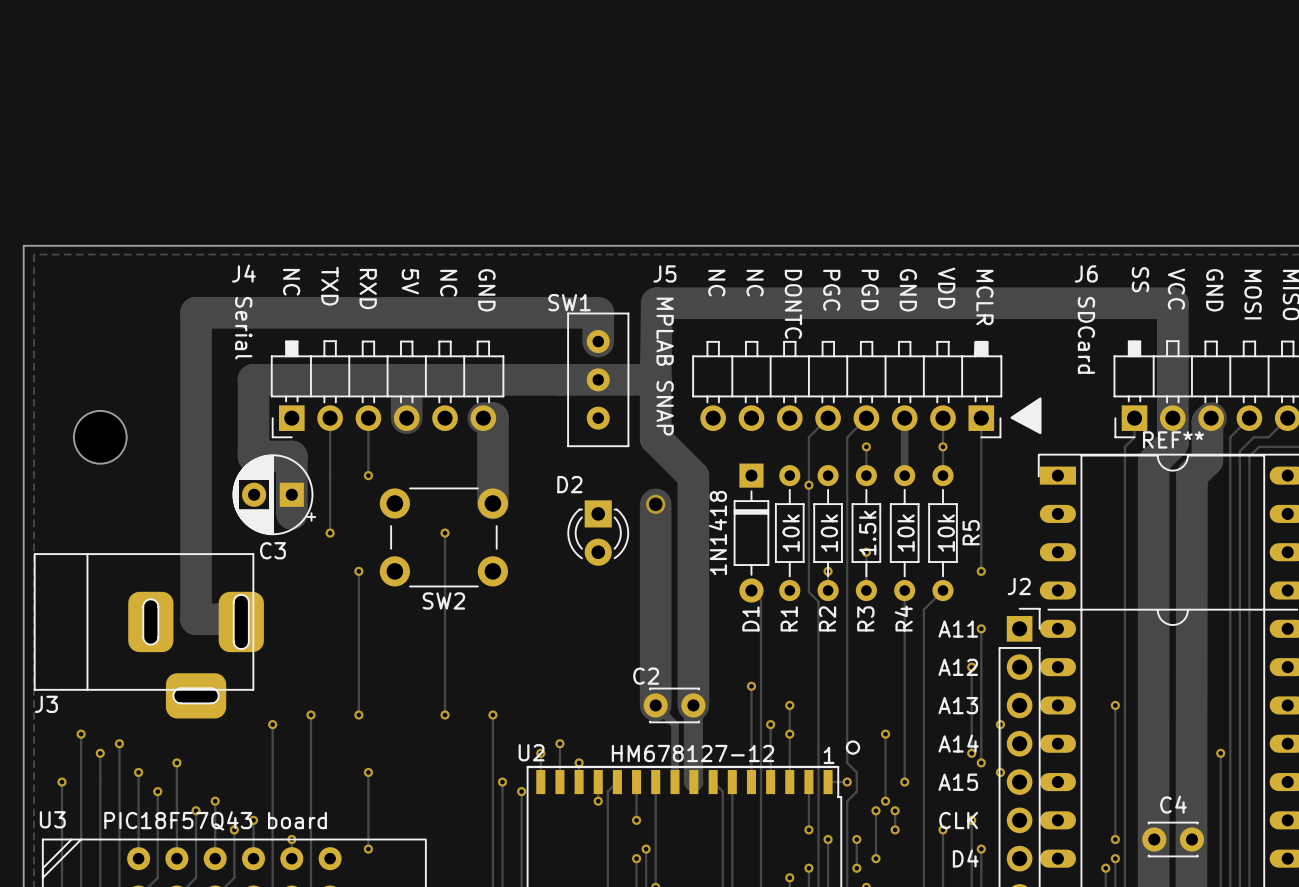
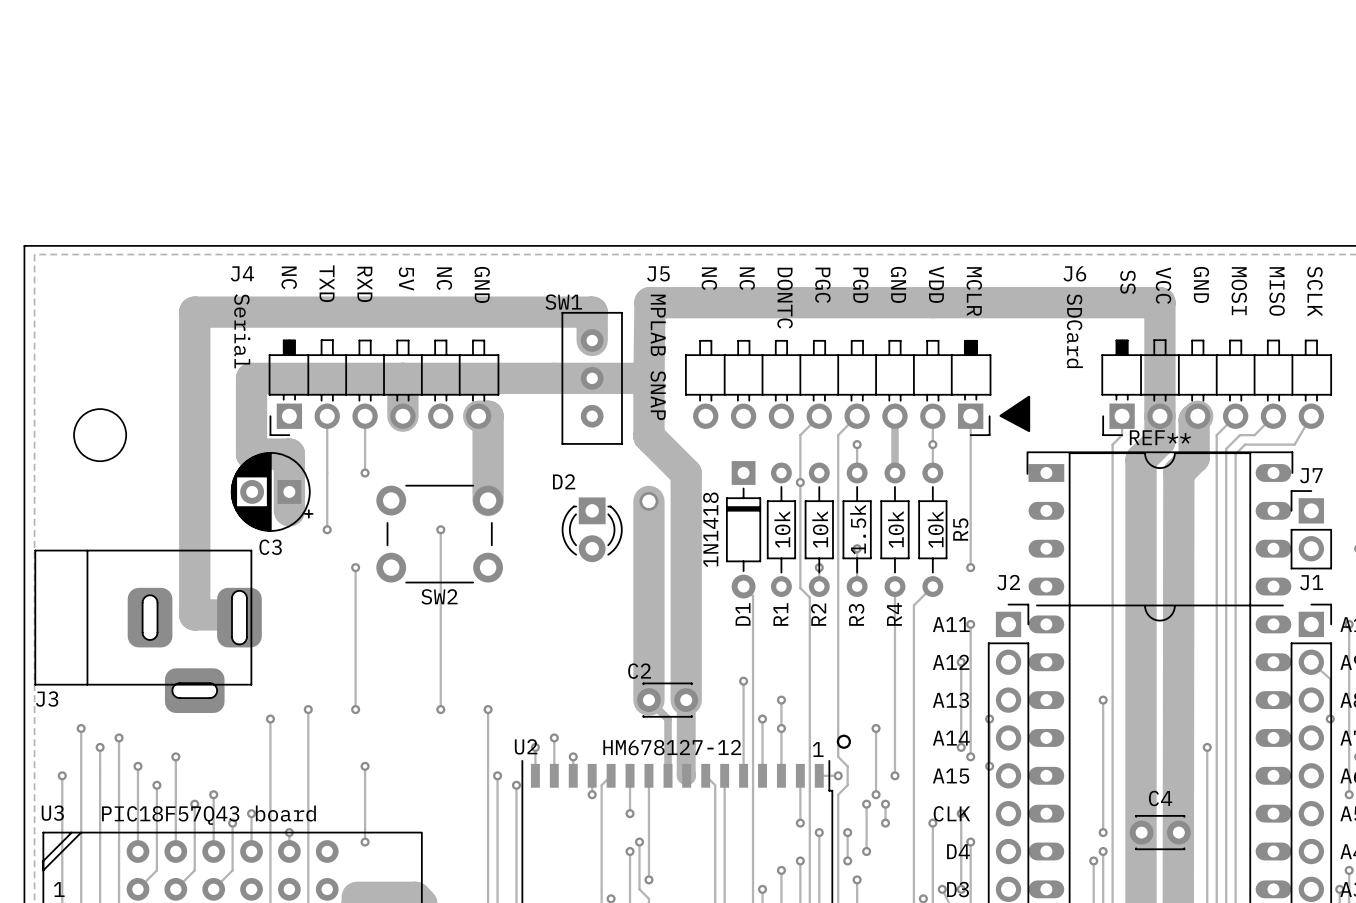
line: (527, 766) (838, 766) -> none

